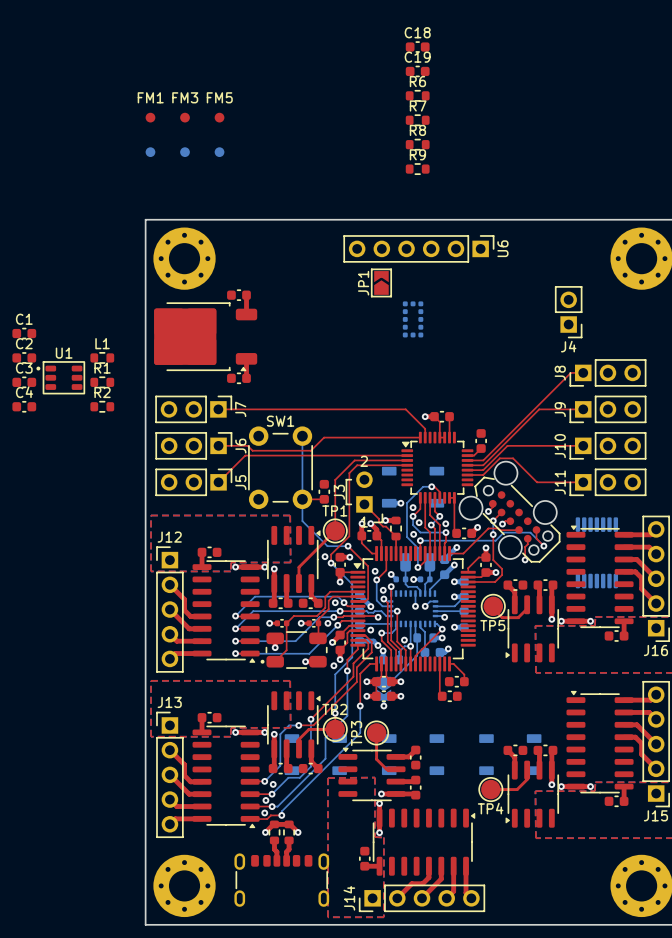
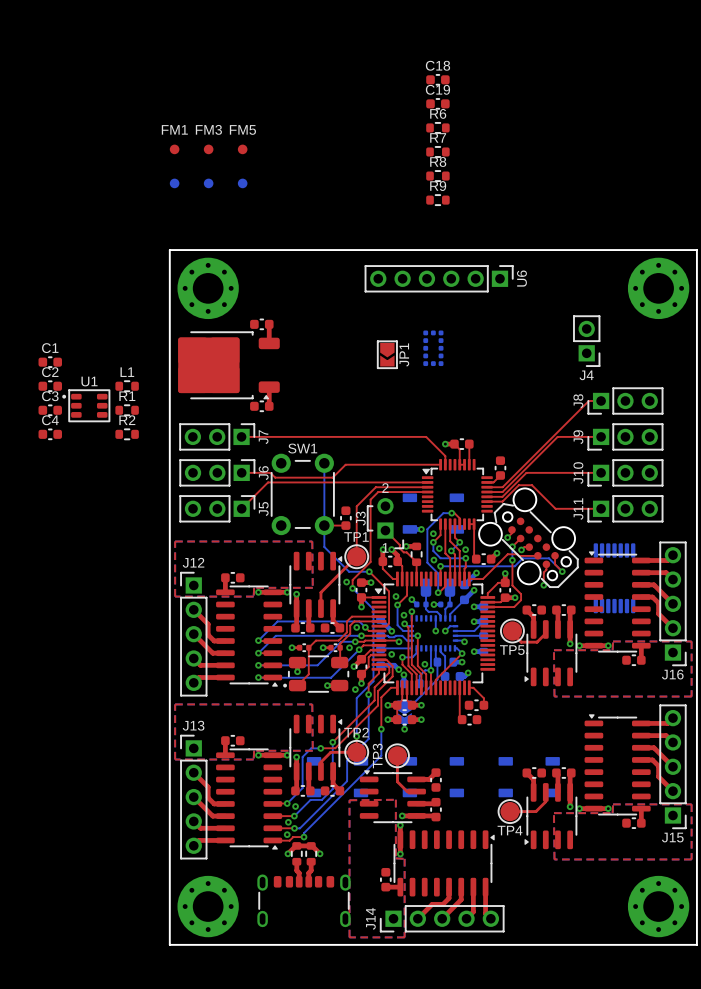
JP1 rotation: 0° (381, 282) -> 180° (387, 354)
JP1 position: (381, 282) -> (387, 354)

